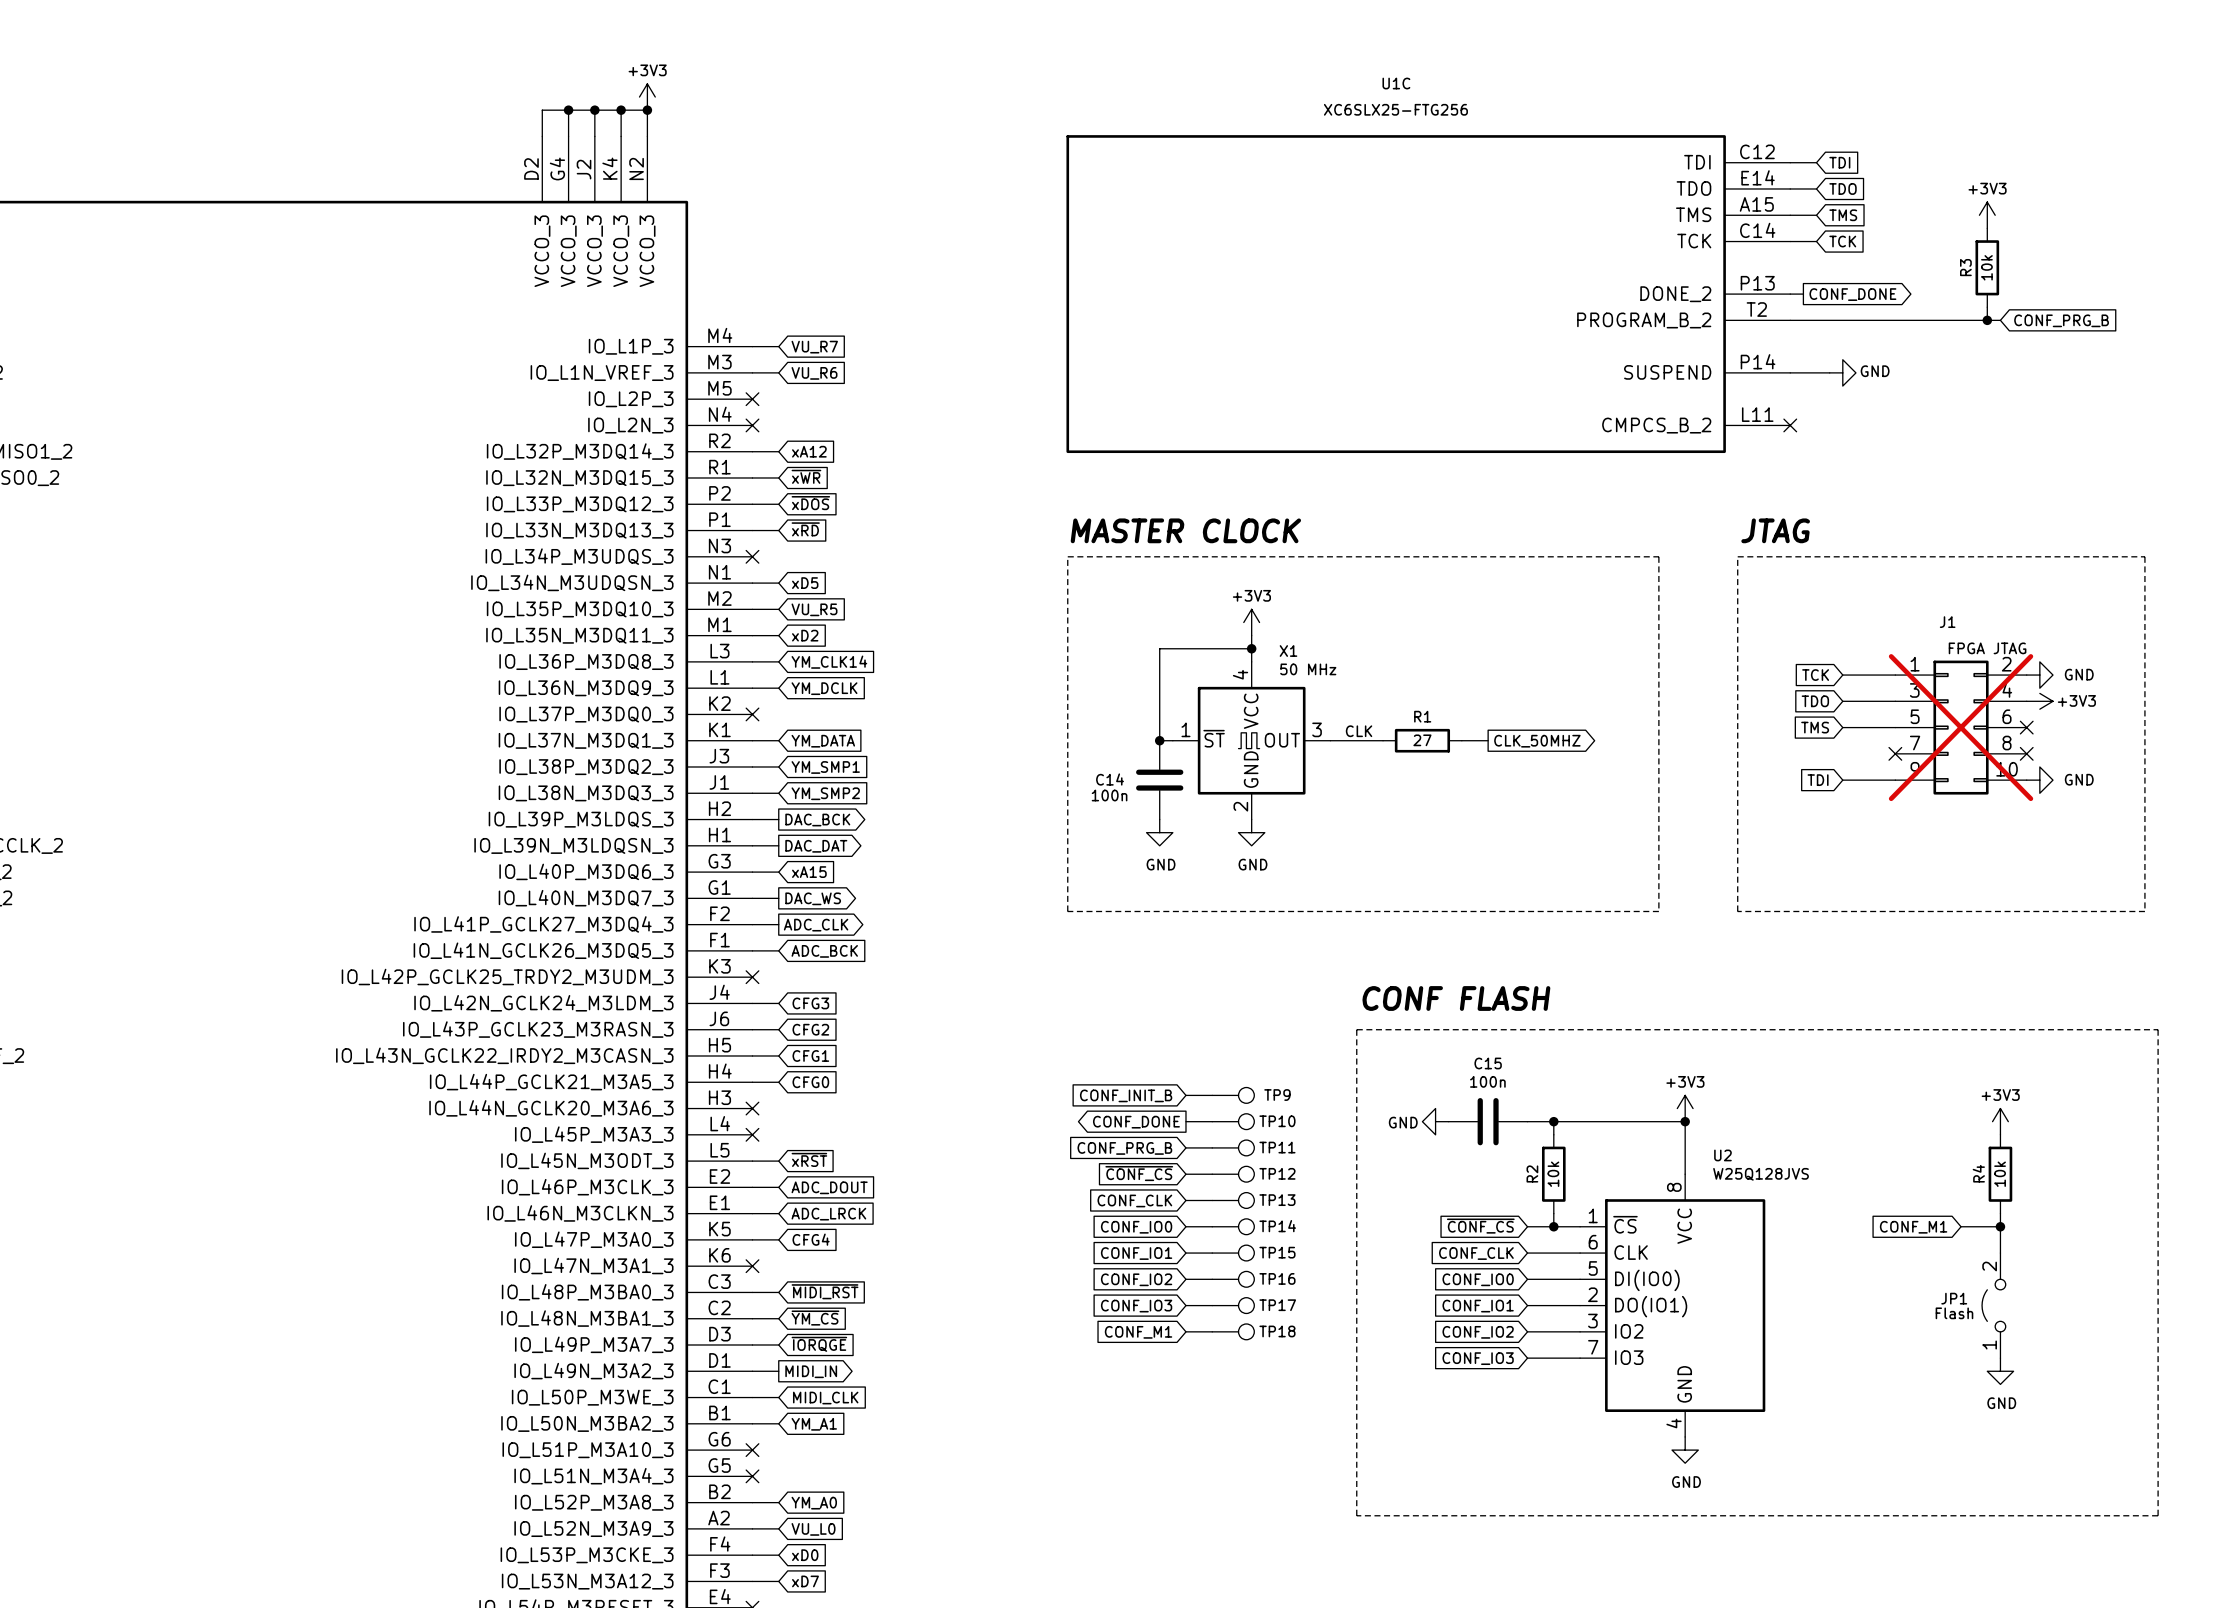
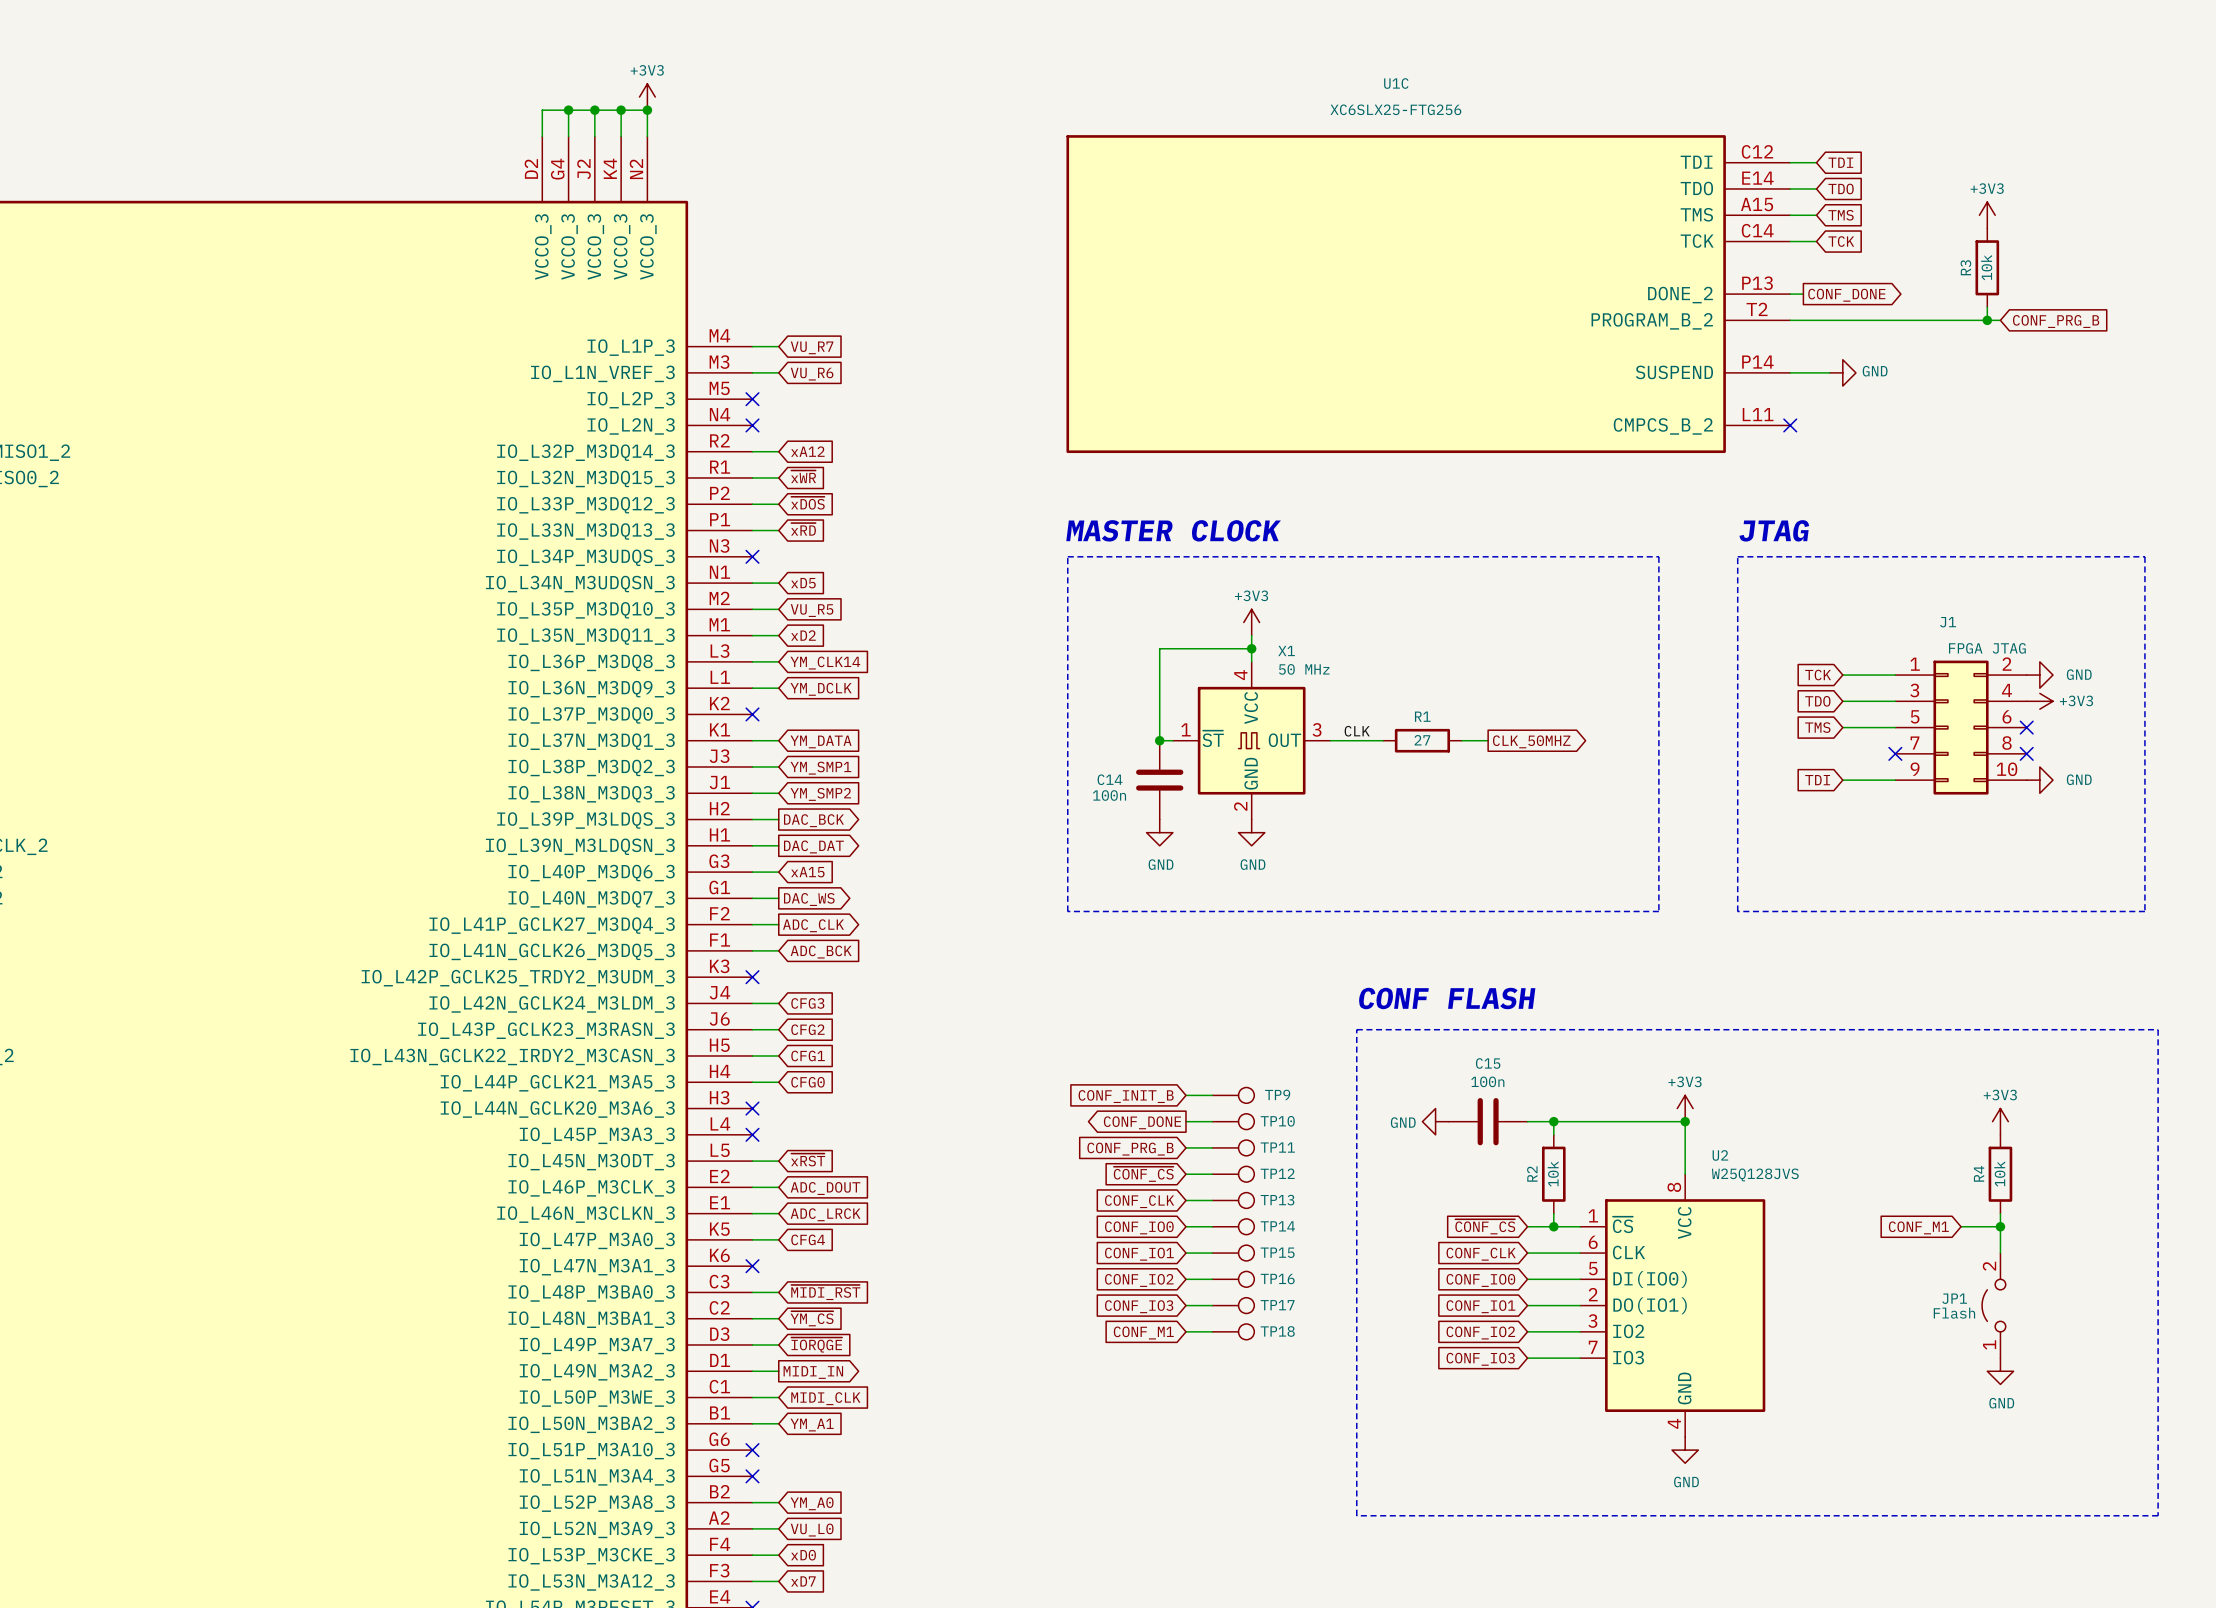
J1 do-not-place cross: (1961, 727) -> none

